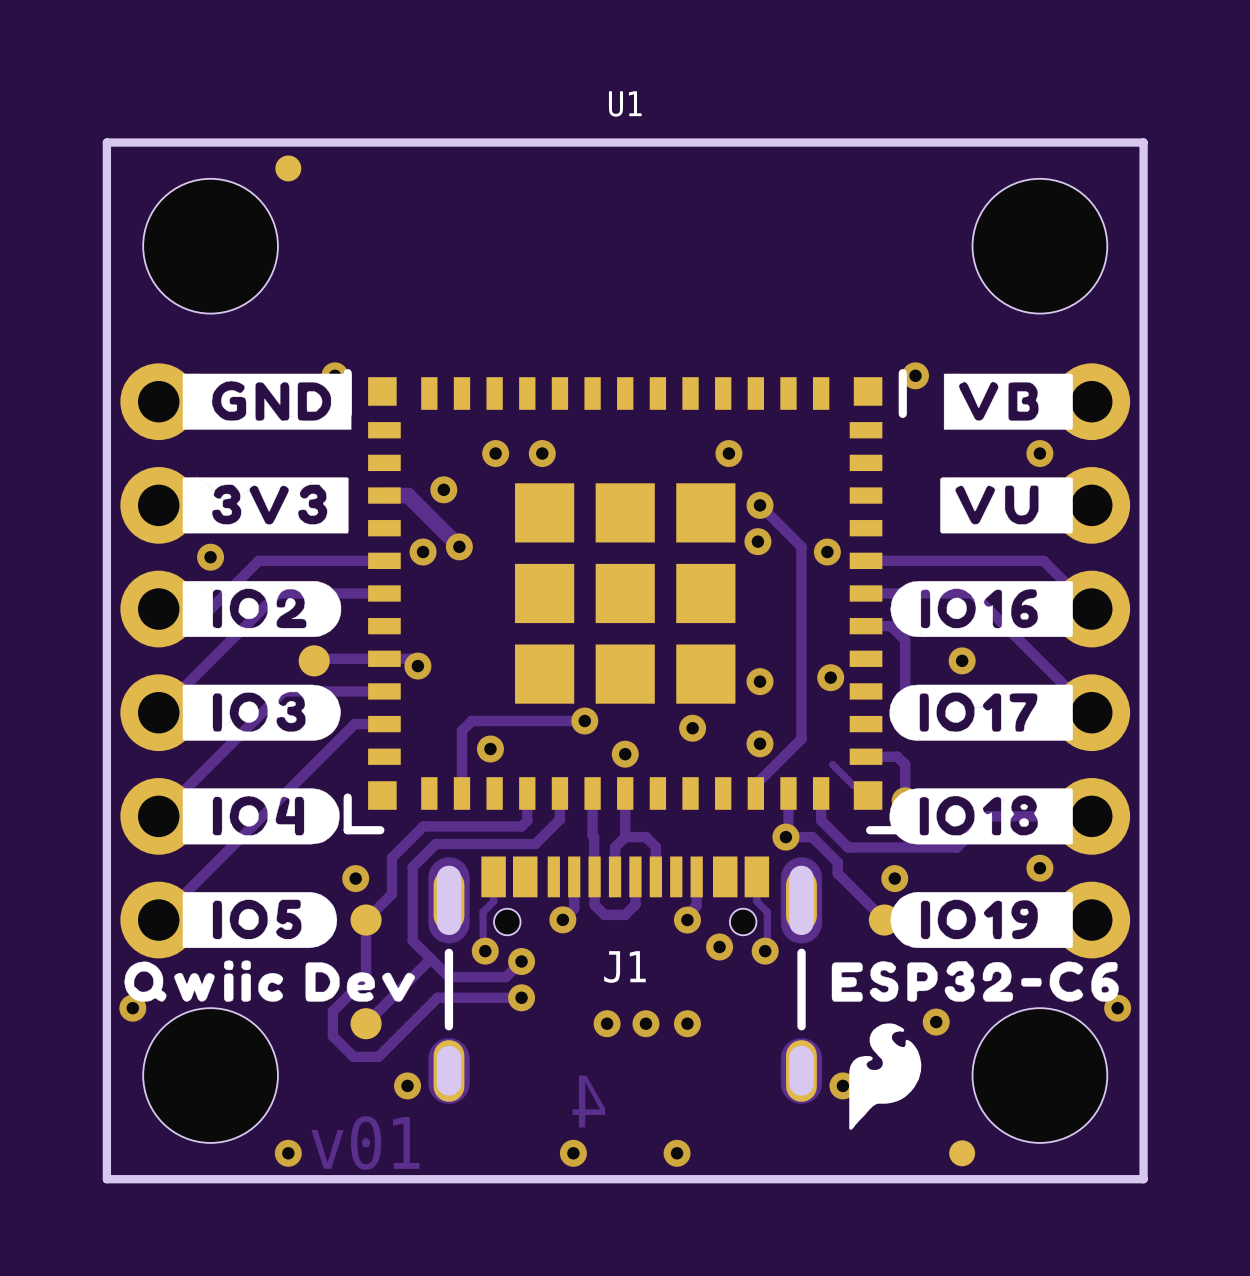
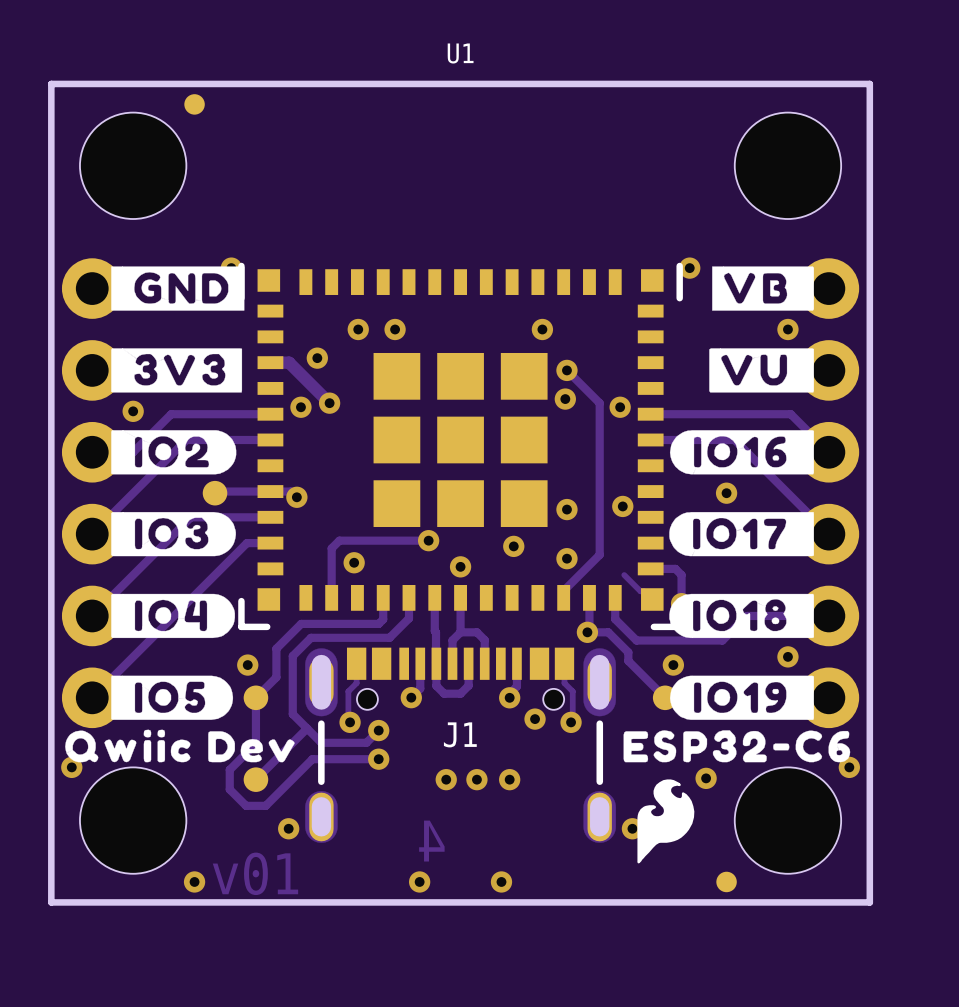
track: (866, 626) (891, 626) (905, 640) (905, 712) -> none

